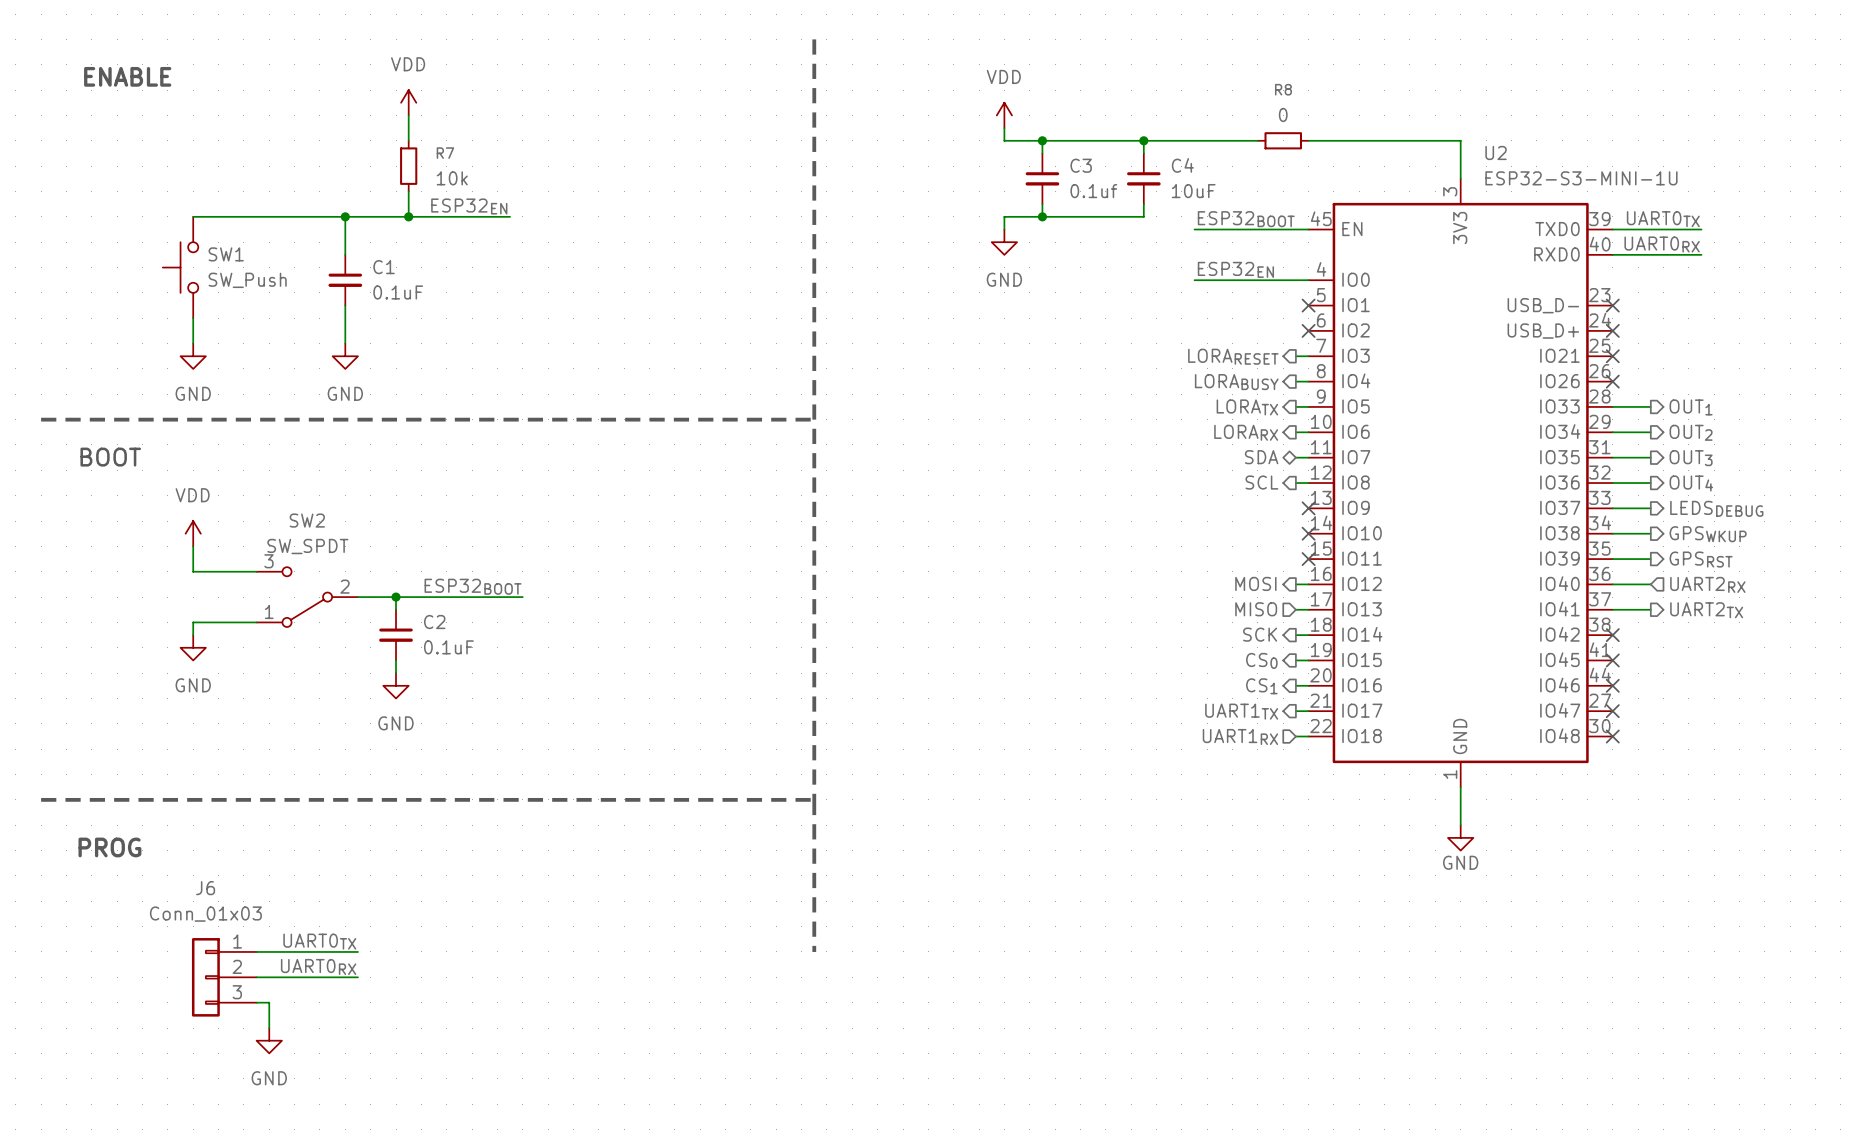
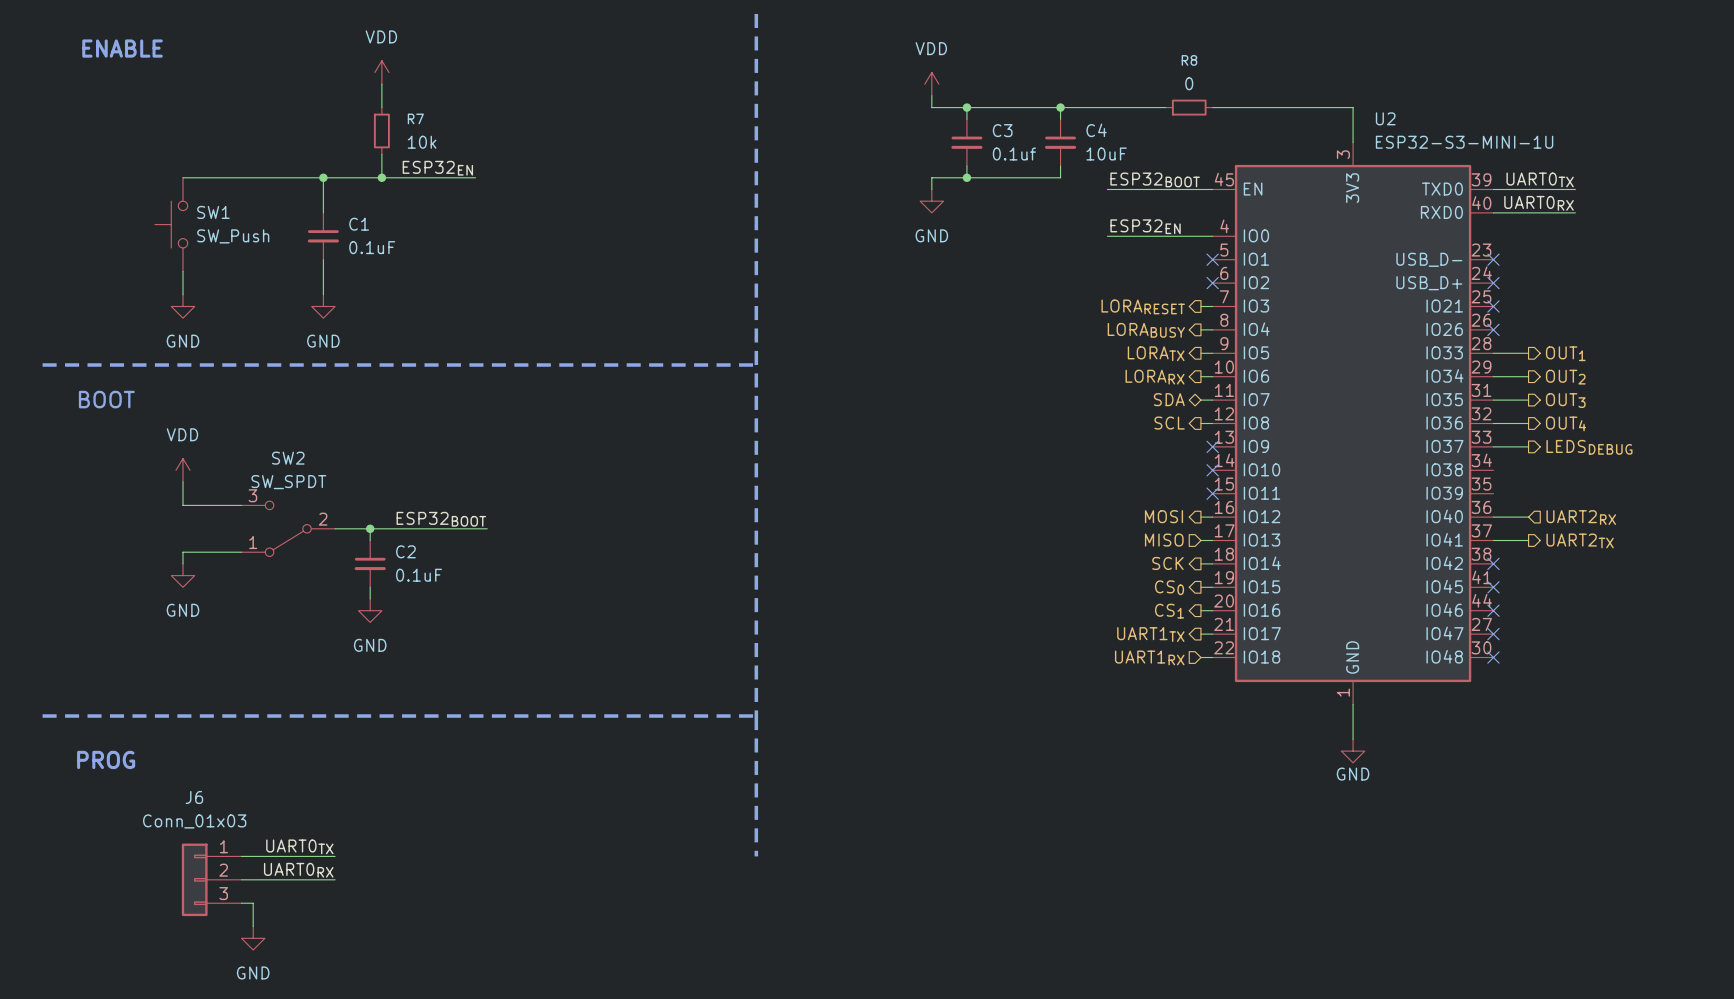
wire: (1612, 533) (1650, 533) -> none
hierarchical label: GPSWKUP (1708, 534) -> none
wire: (1612, 559) (1650, 559) -> none
hierarchical label: GPSRST (1701, 559) -> none

